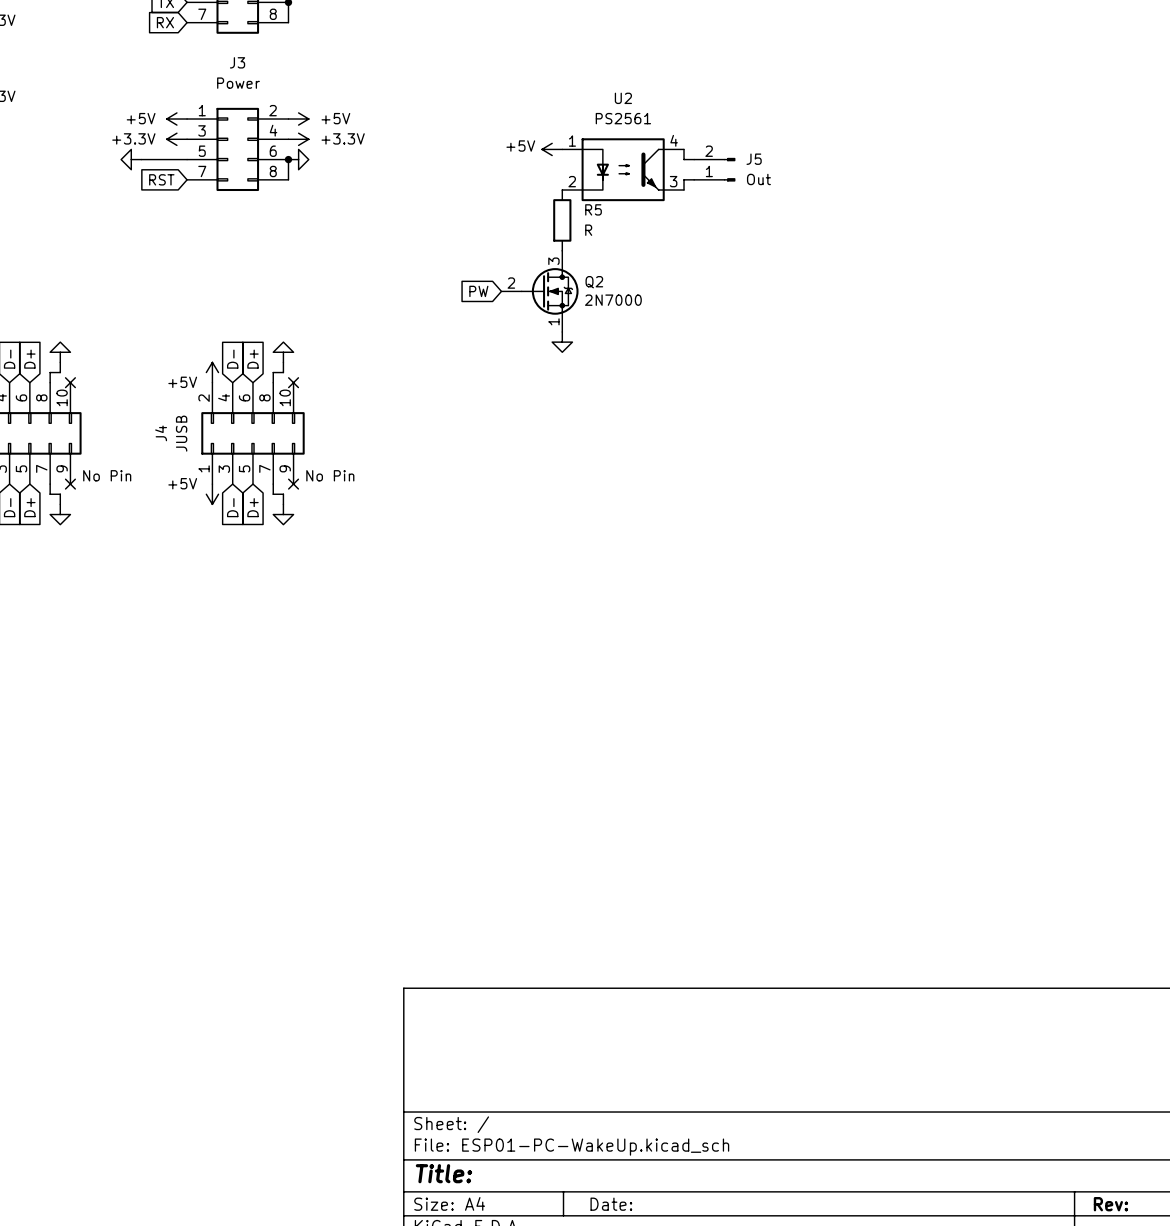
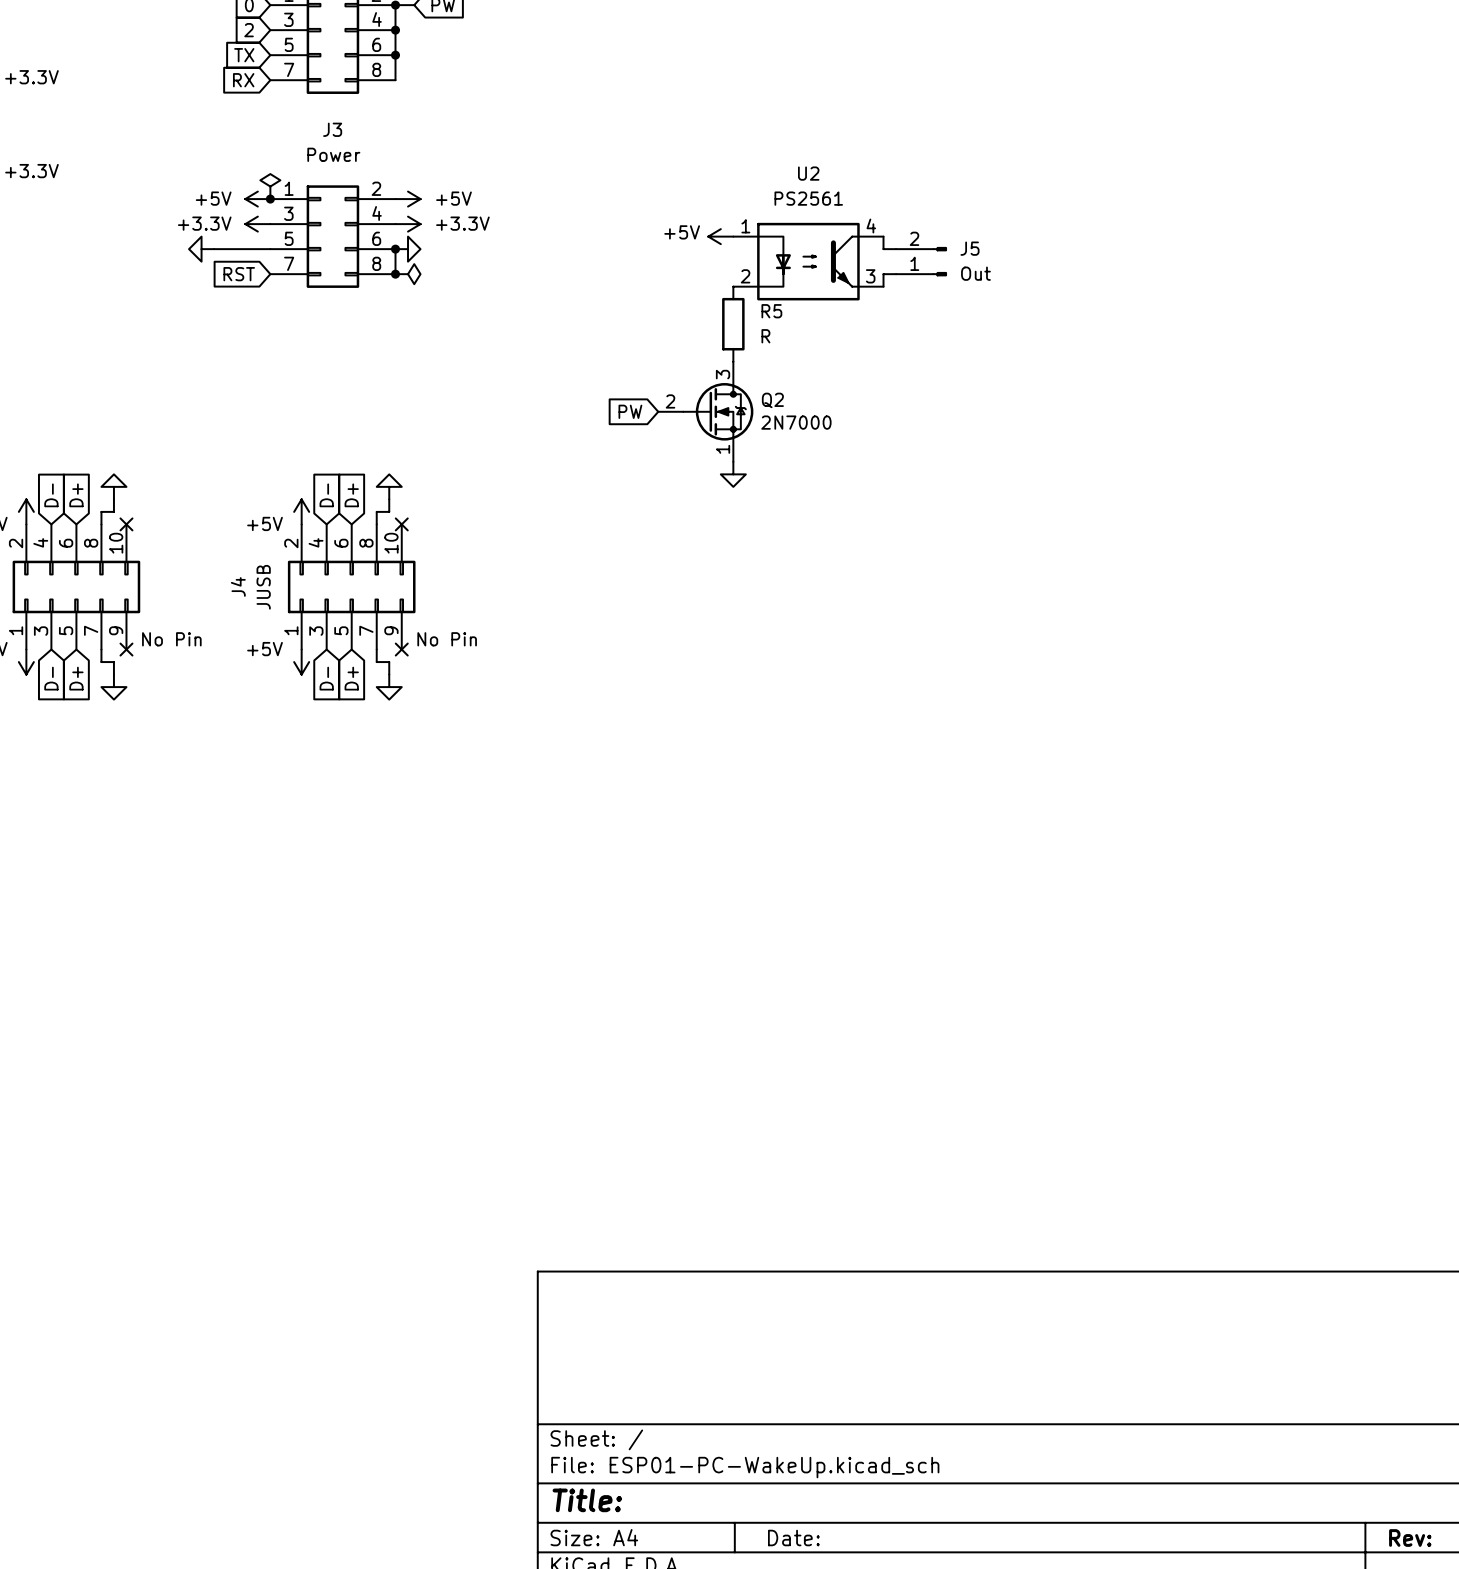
power symbol: none -> (270, 186)
junction: none -> (270, 199)
junction: none -> (395, 274)
power symbol: none -> (408, 274)

